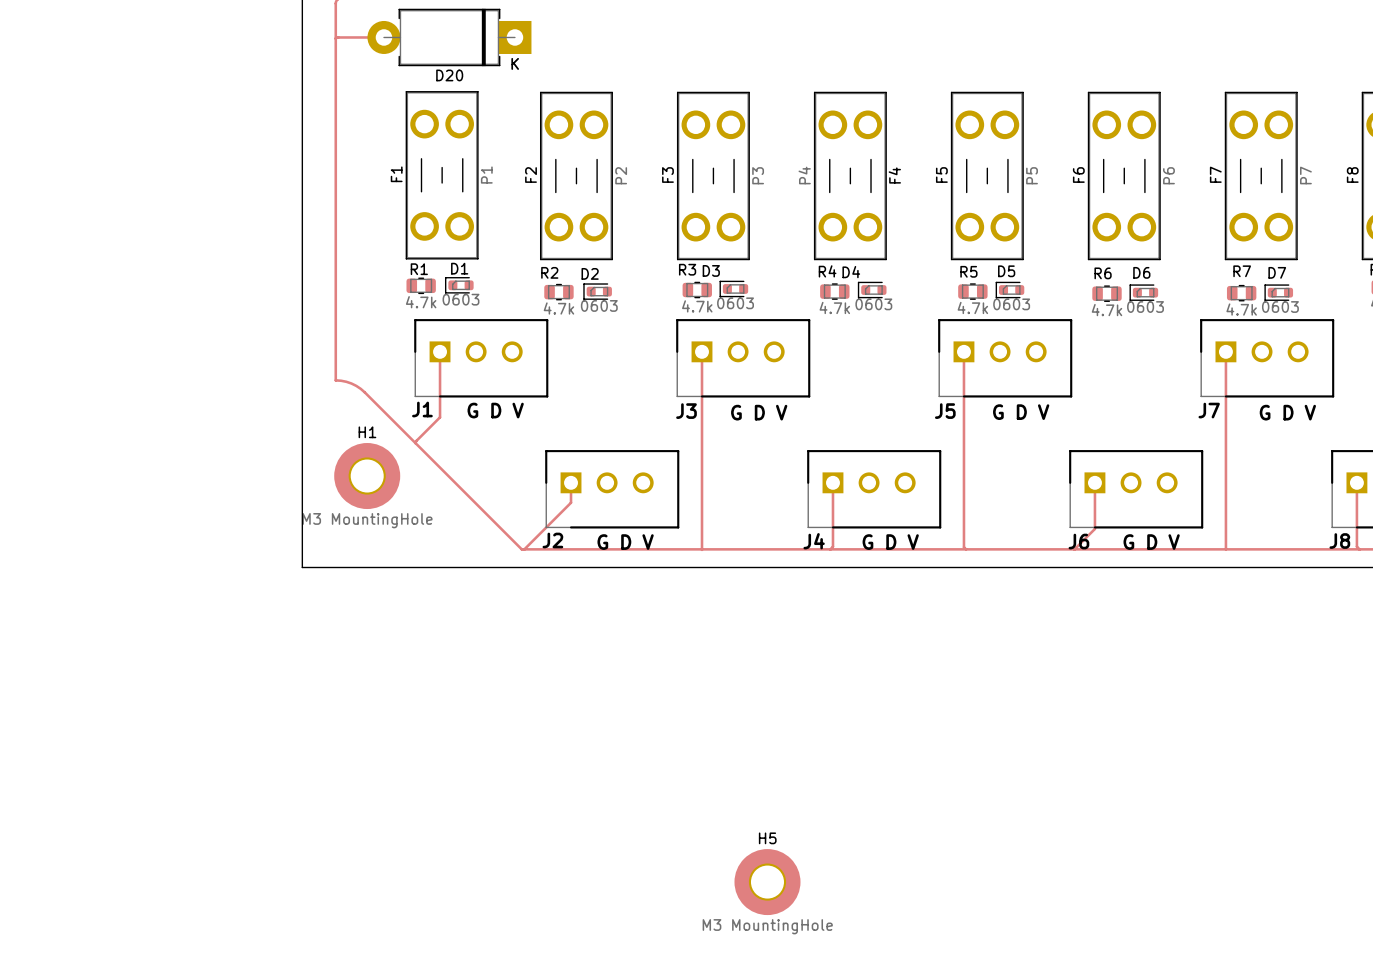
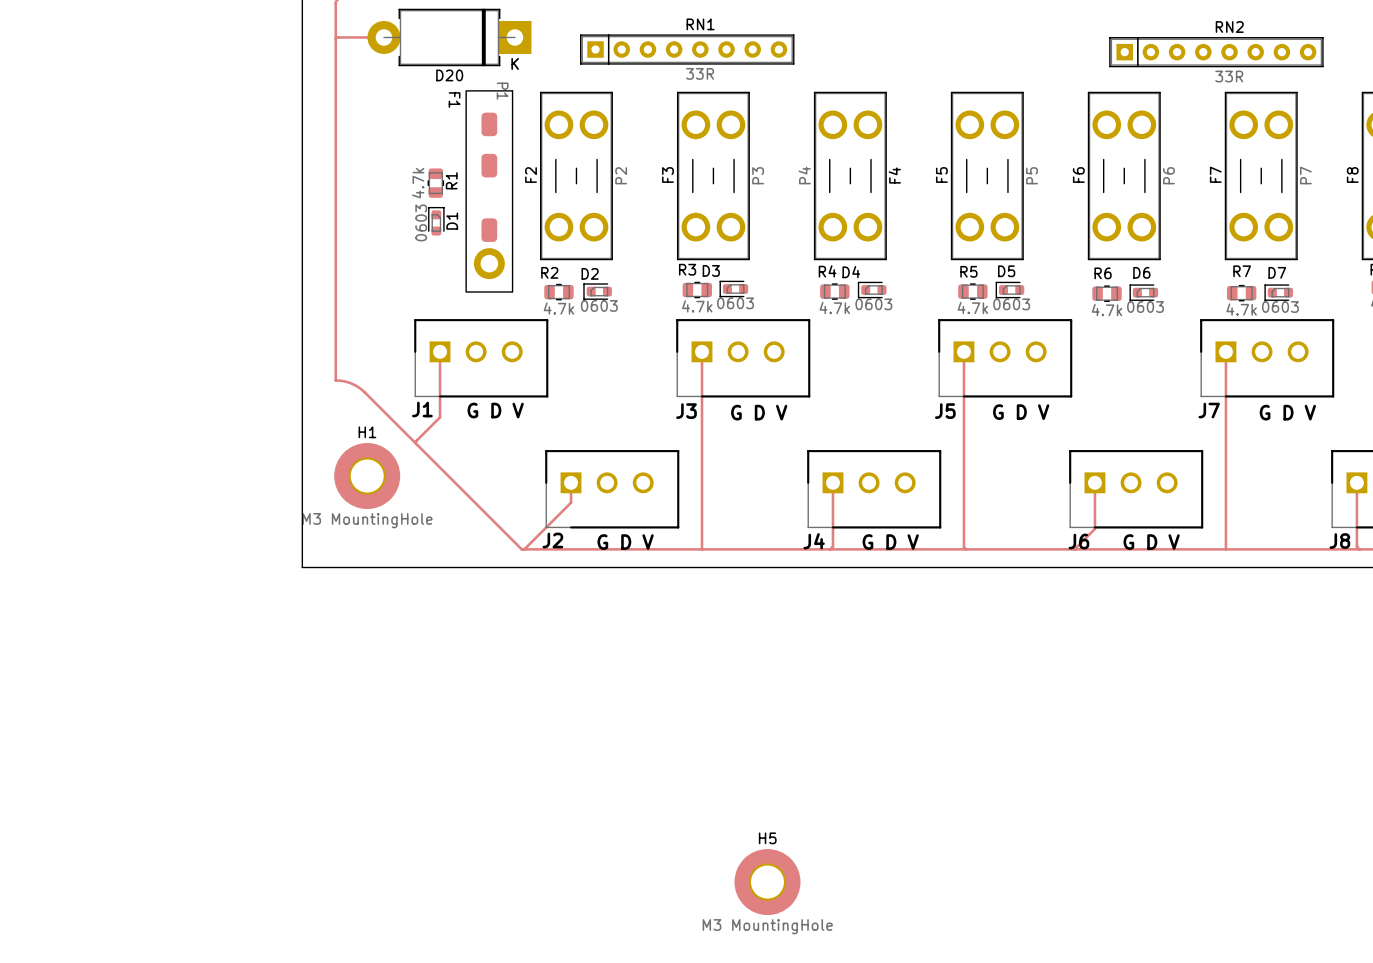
RN1: none -> 33R (687, 49)
RN2: none -> 33R (1216, 52)
F1 footprint: [405, 91, 479, 260] -> [465, 90, 514, 293]
F1 name position: F1 (396, 174) -> F1 (454, 100)
F1 value position: P1 (486, 175) -> P1 (502, 91)
R1 rotation: 0° (421, 285) -> 90° clockwise (435, 183)
R1 position: (421, 285) -> (435, 183)
D1 rotation: 0° (459, 285) -> 90° clockwise (436, 221)
D1 position: (459, 285) -> (436, 221)

